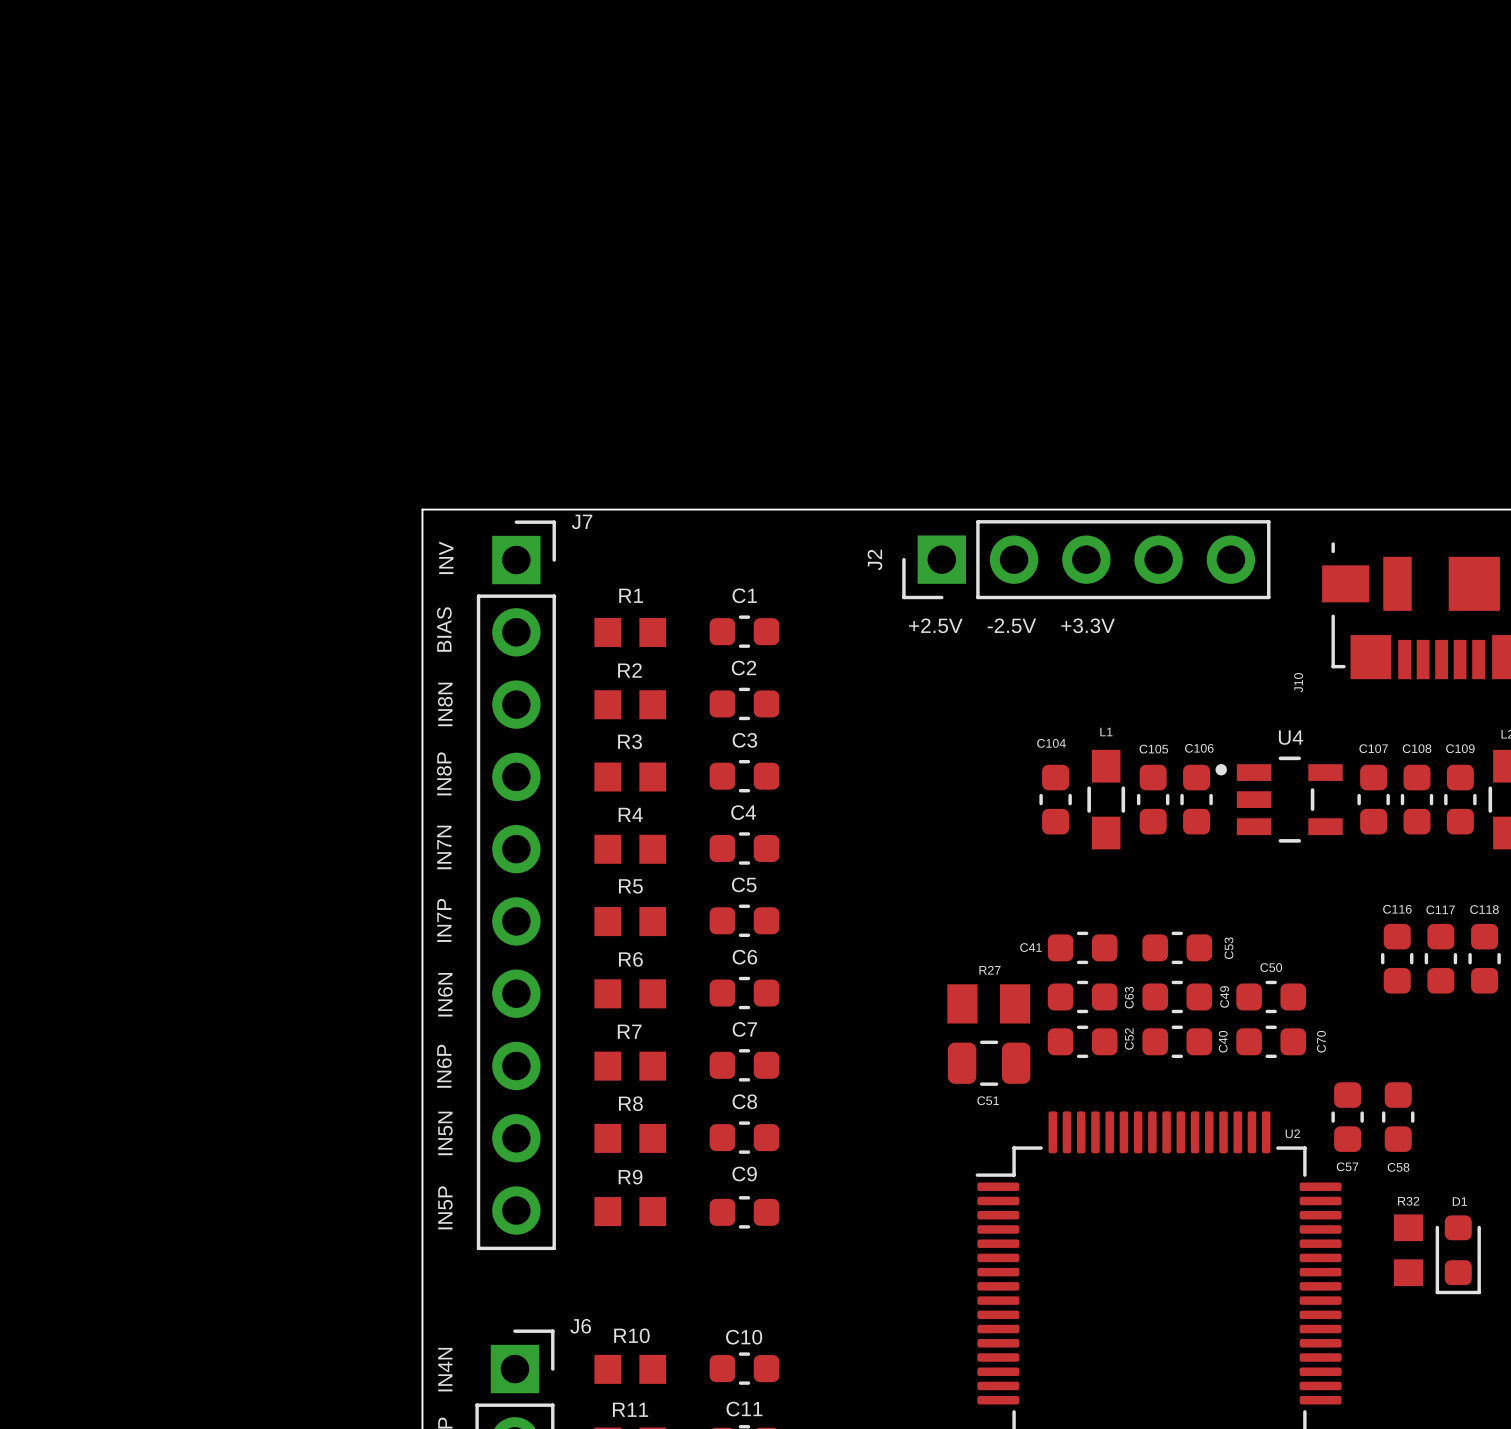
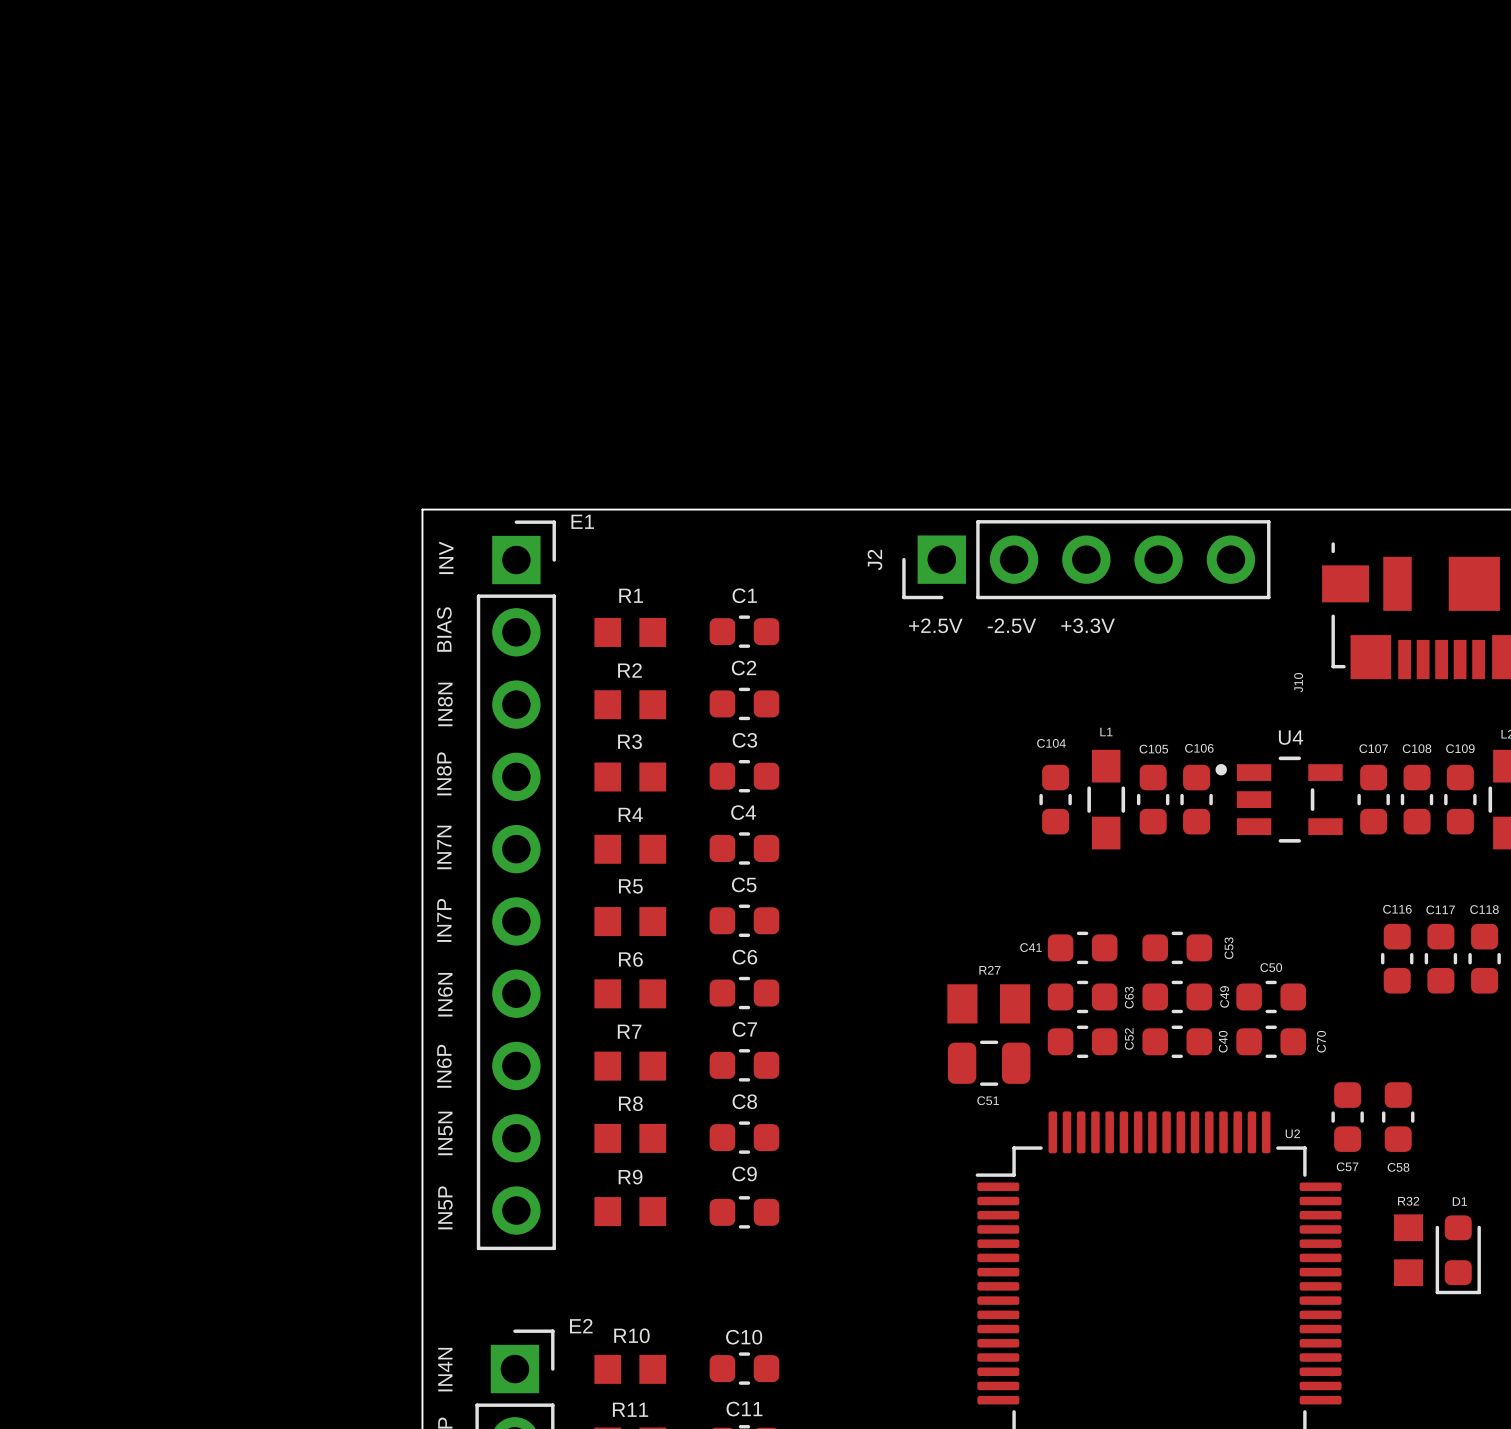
J7 name: J7 (582, 521) -> E1 (582, 521)
J6 name: J6 (580, 1326) -> E2 (581, 1326)

